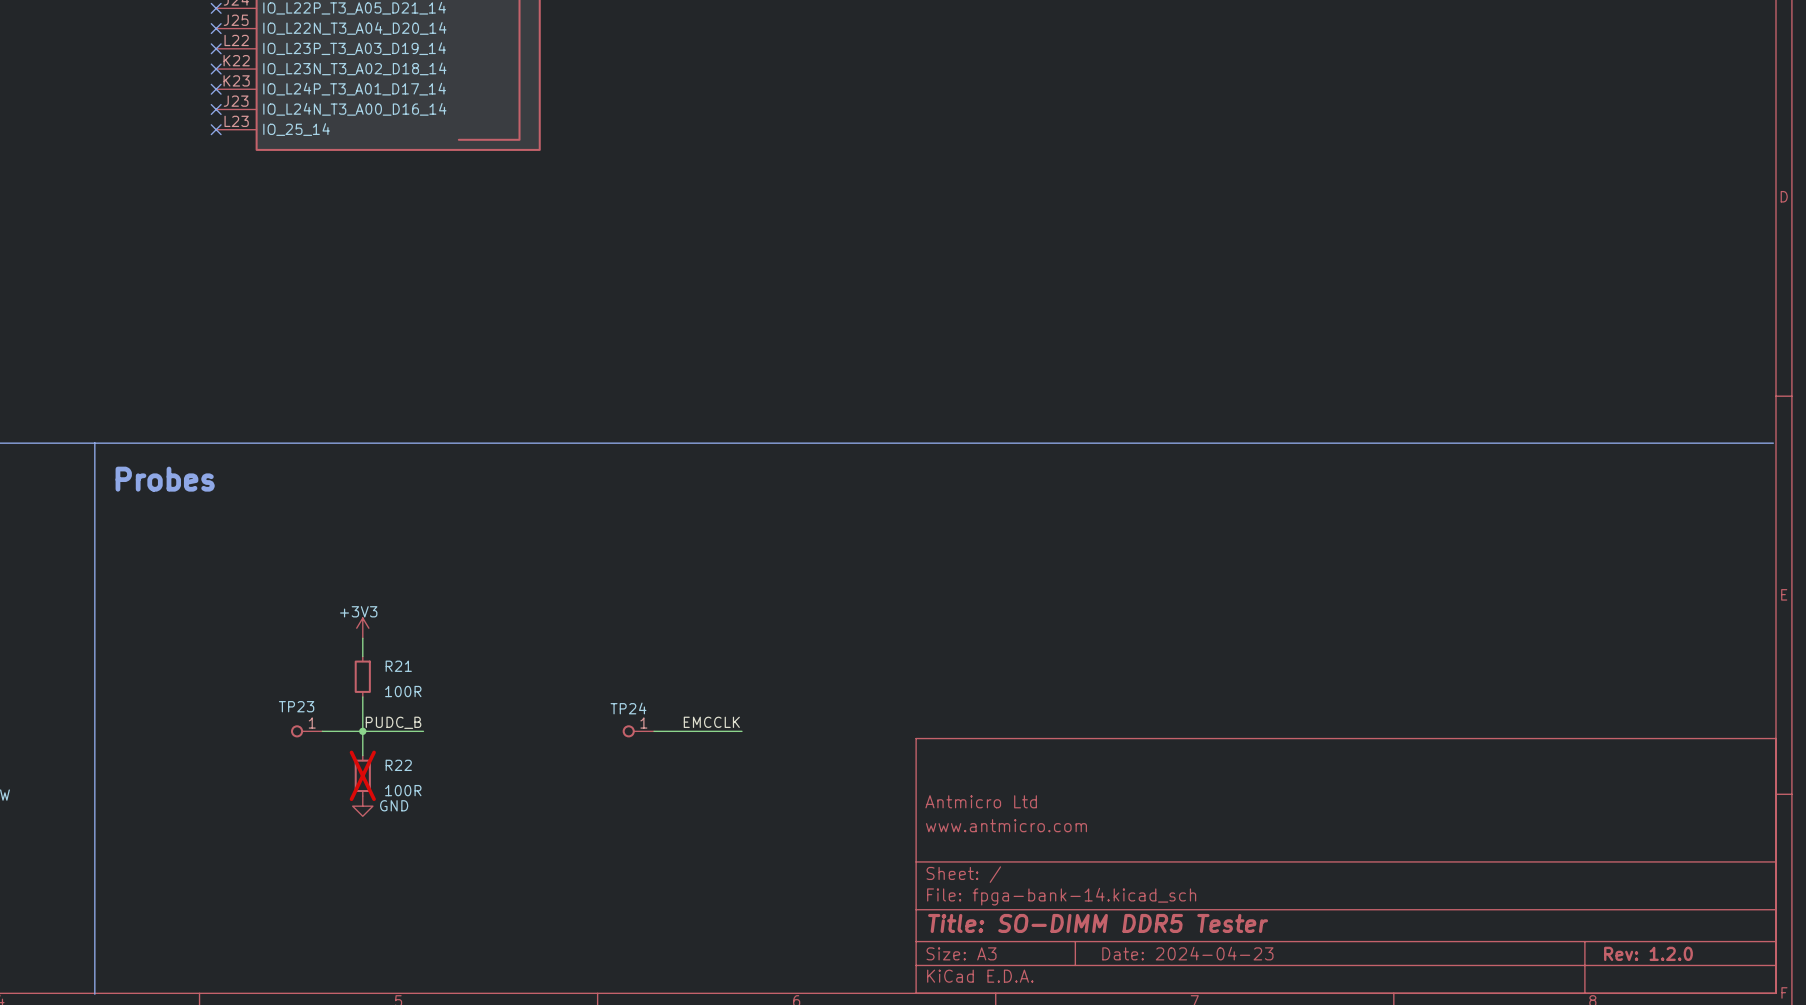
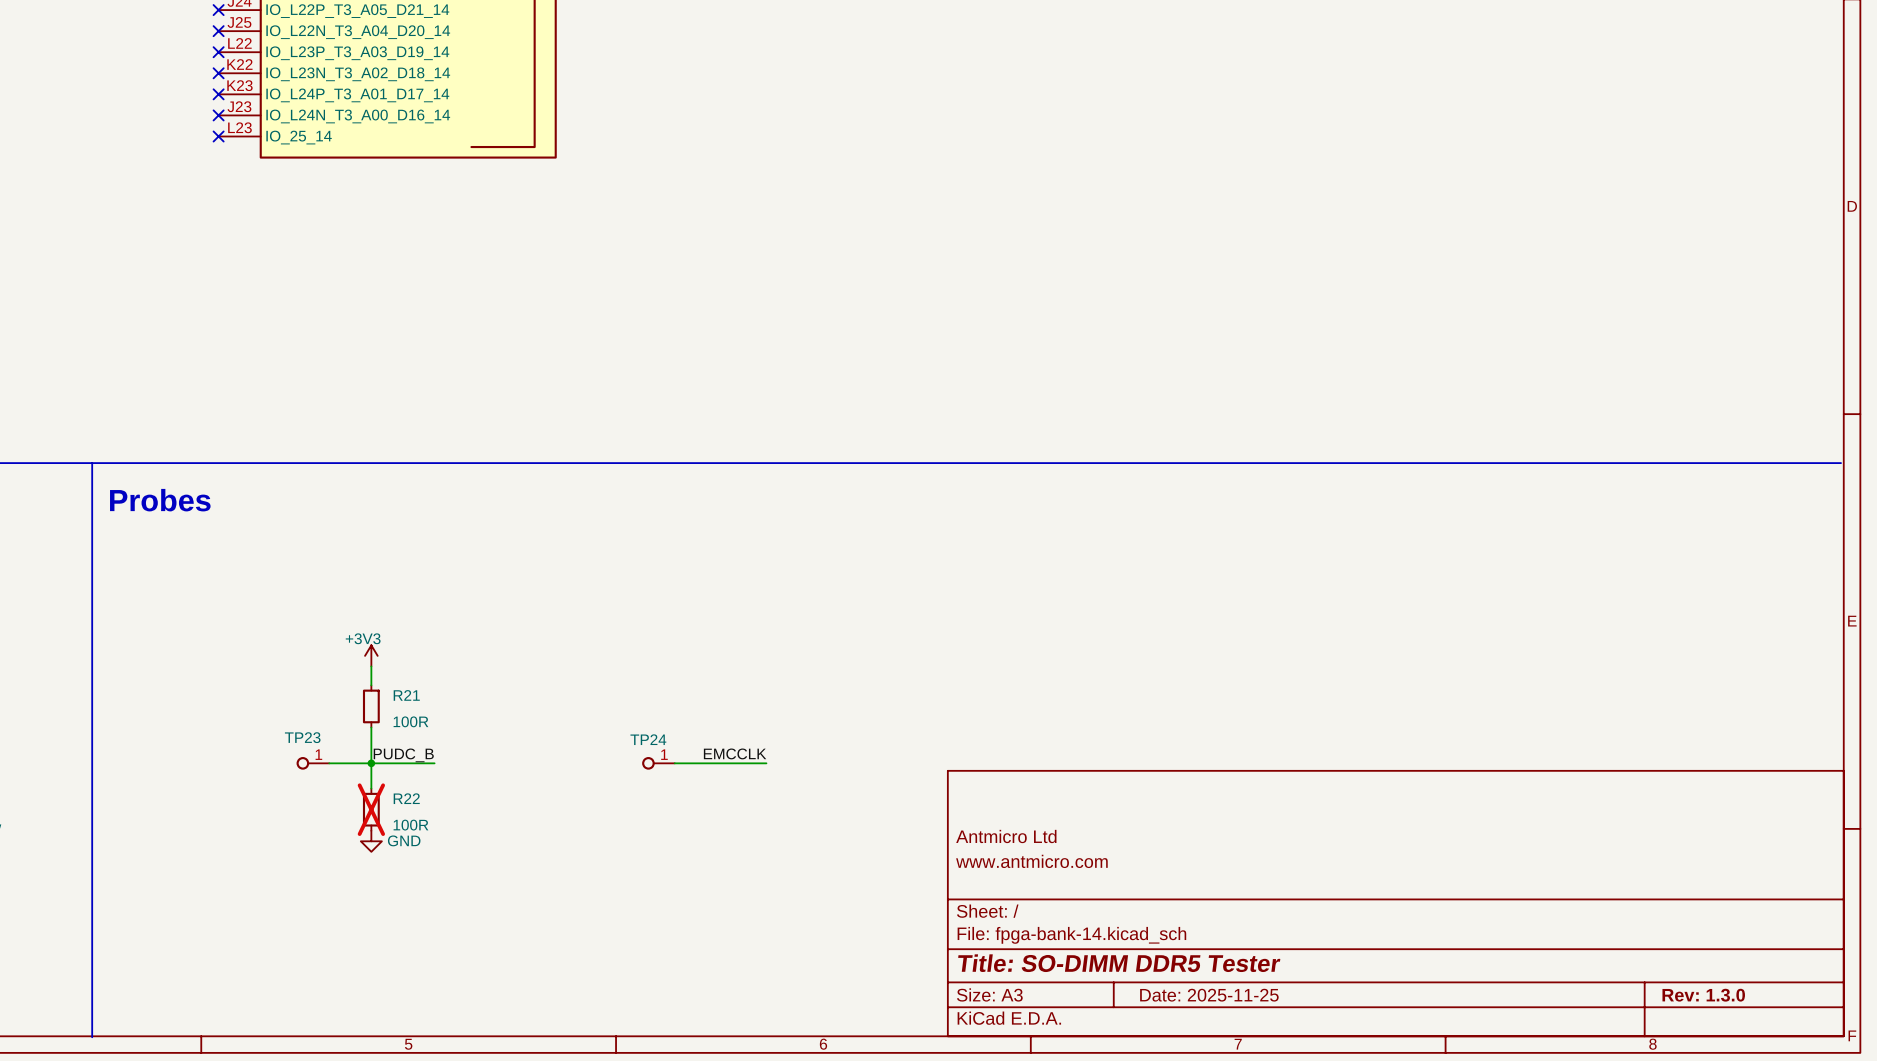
title block: Date: 2024-04-23 (1187, 953) -> Date: 2025-11-25 (1209, 995)
title block: Rev: 1.2.0 (1648, 953) -> Rev: 1.3.0 (1703, 995)

